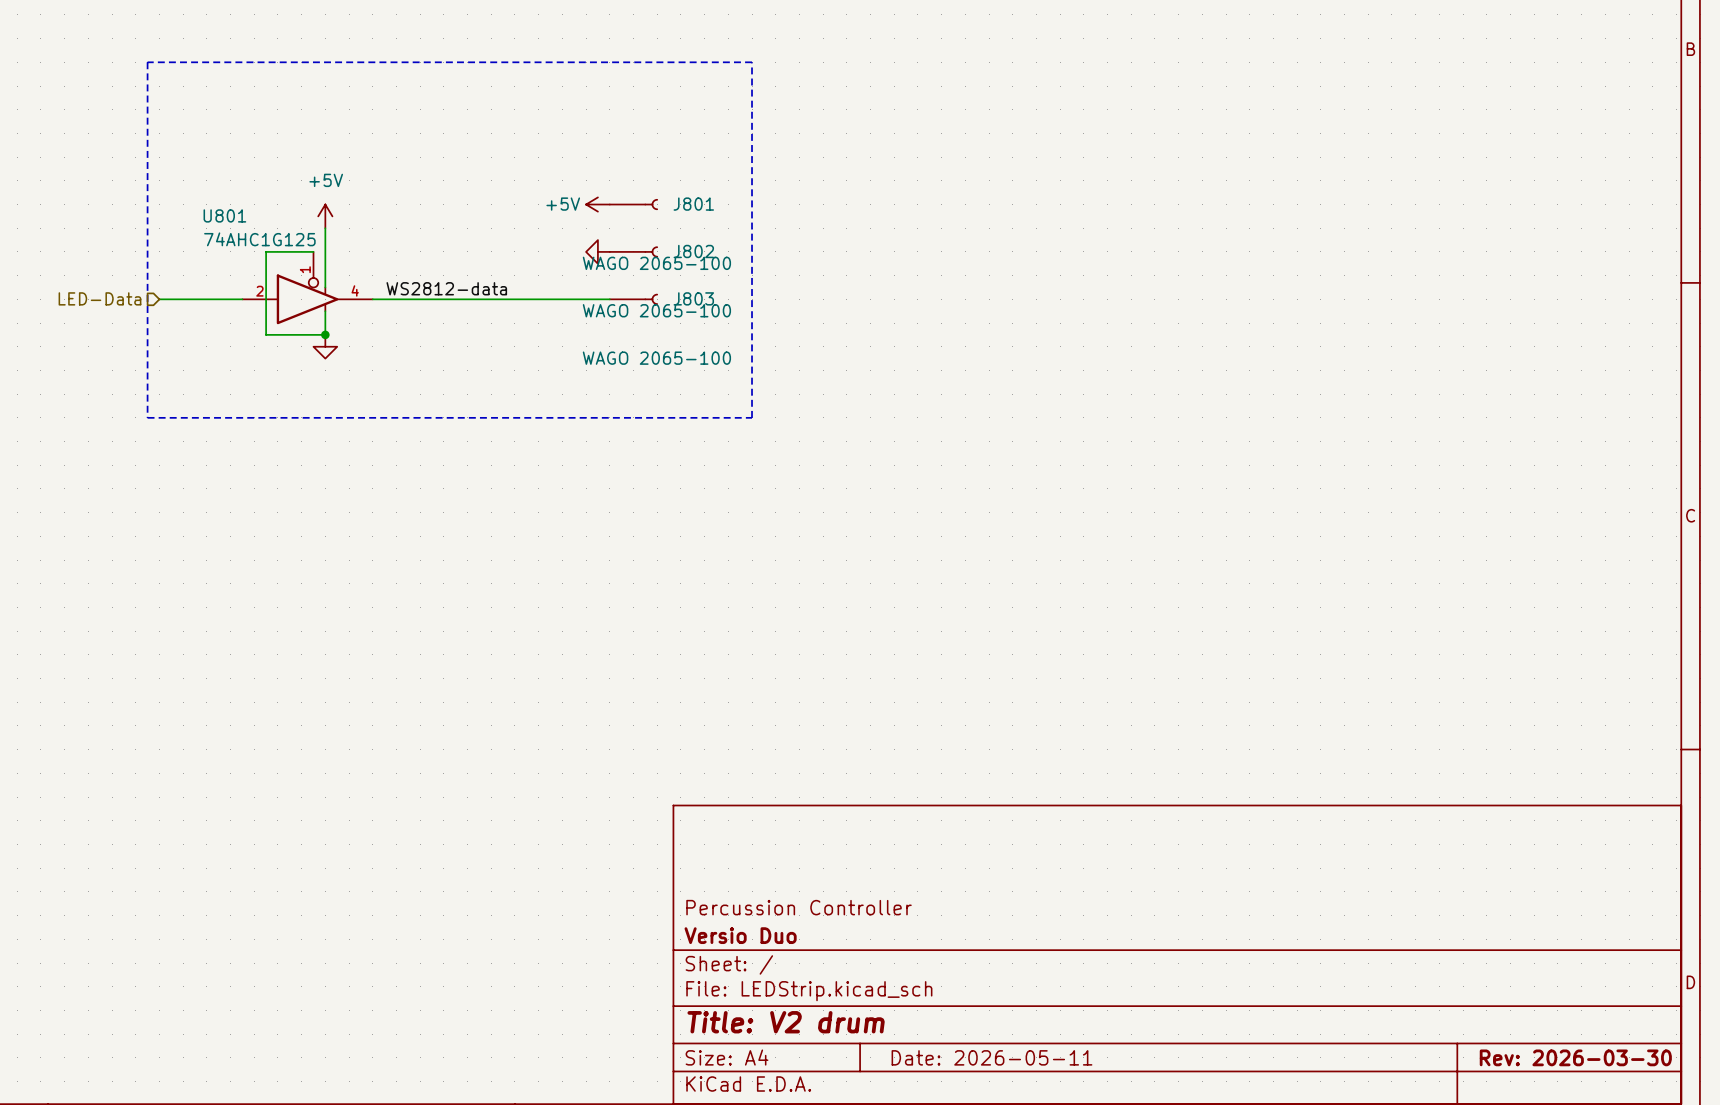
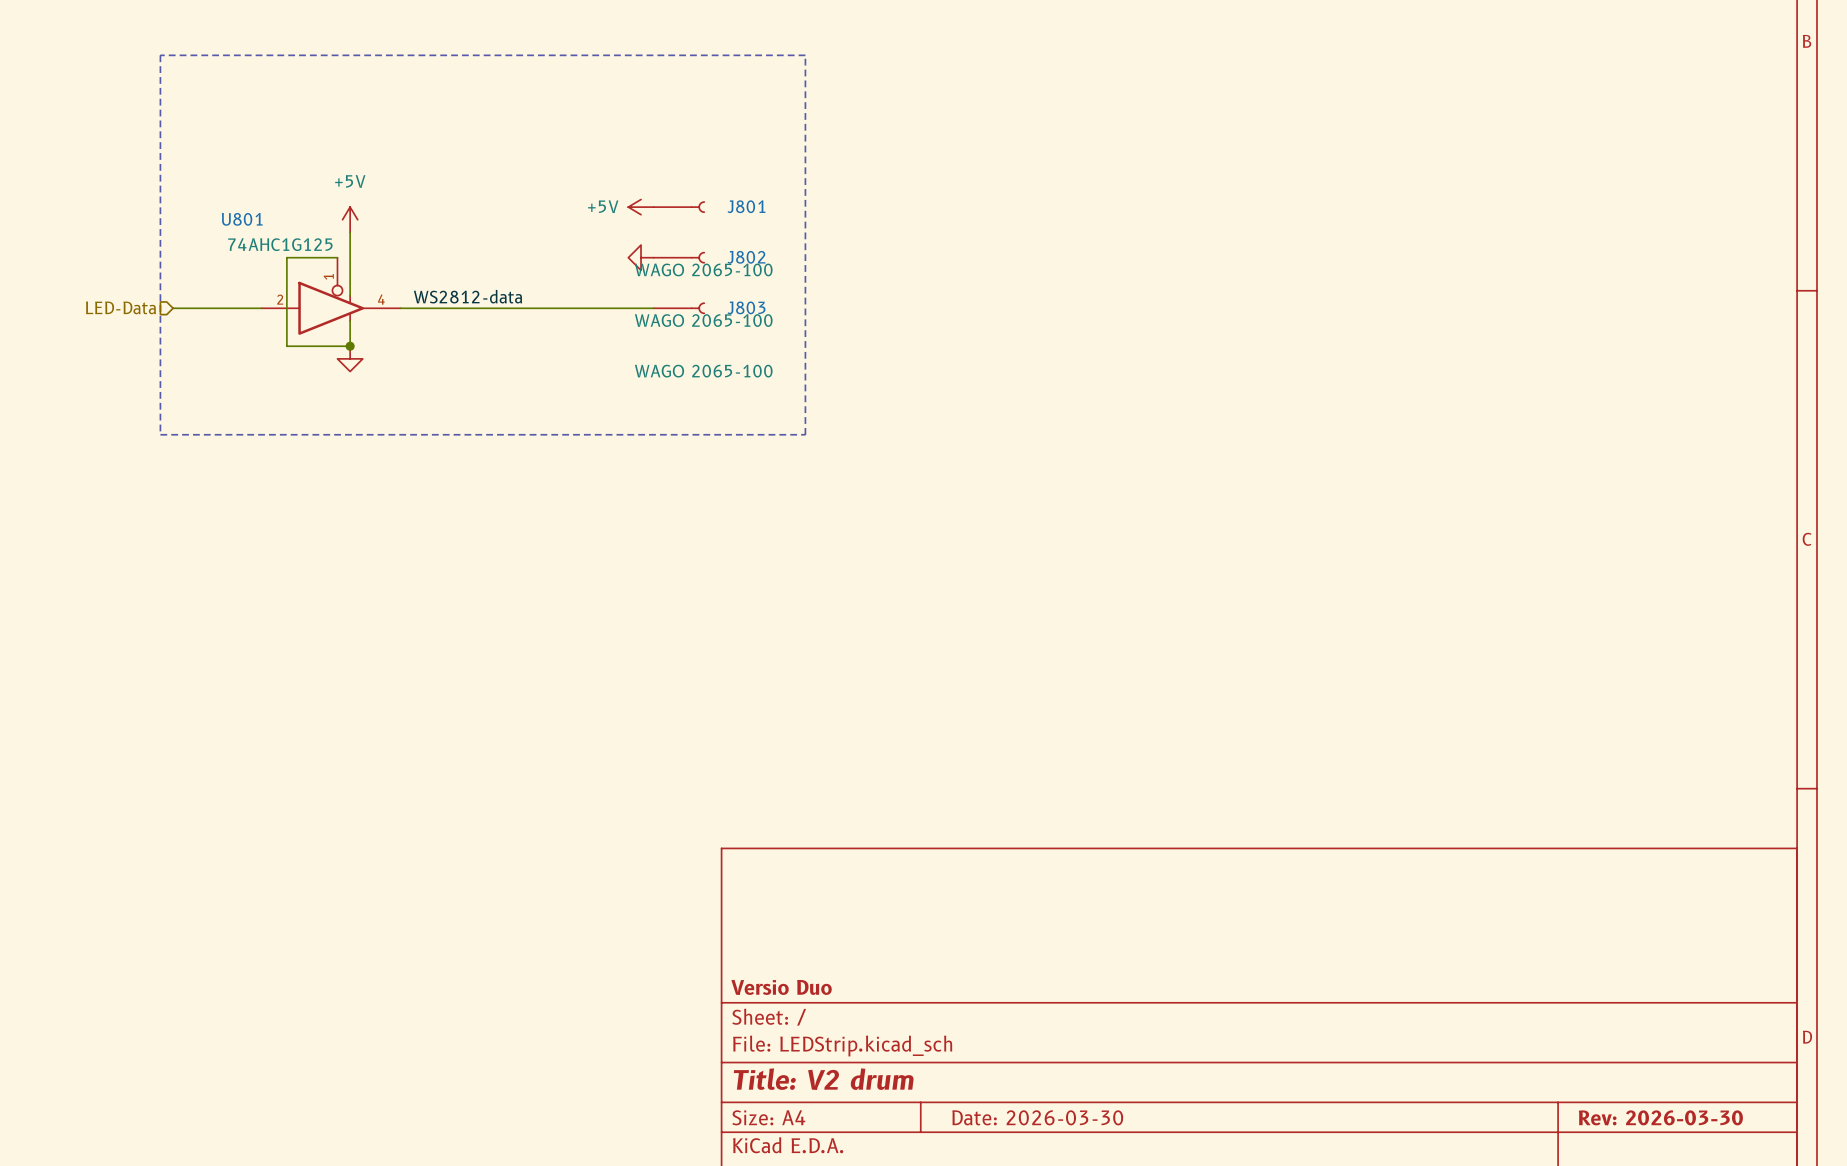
title block: Percussion Controller (799, 907) -> none
title block: Date: 2026-05-11 (991, 1057) -> Date: 2026-03-30 (1037, 1117)

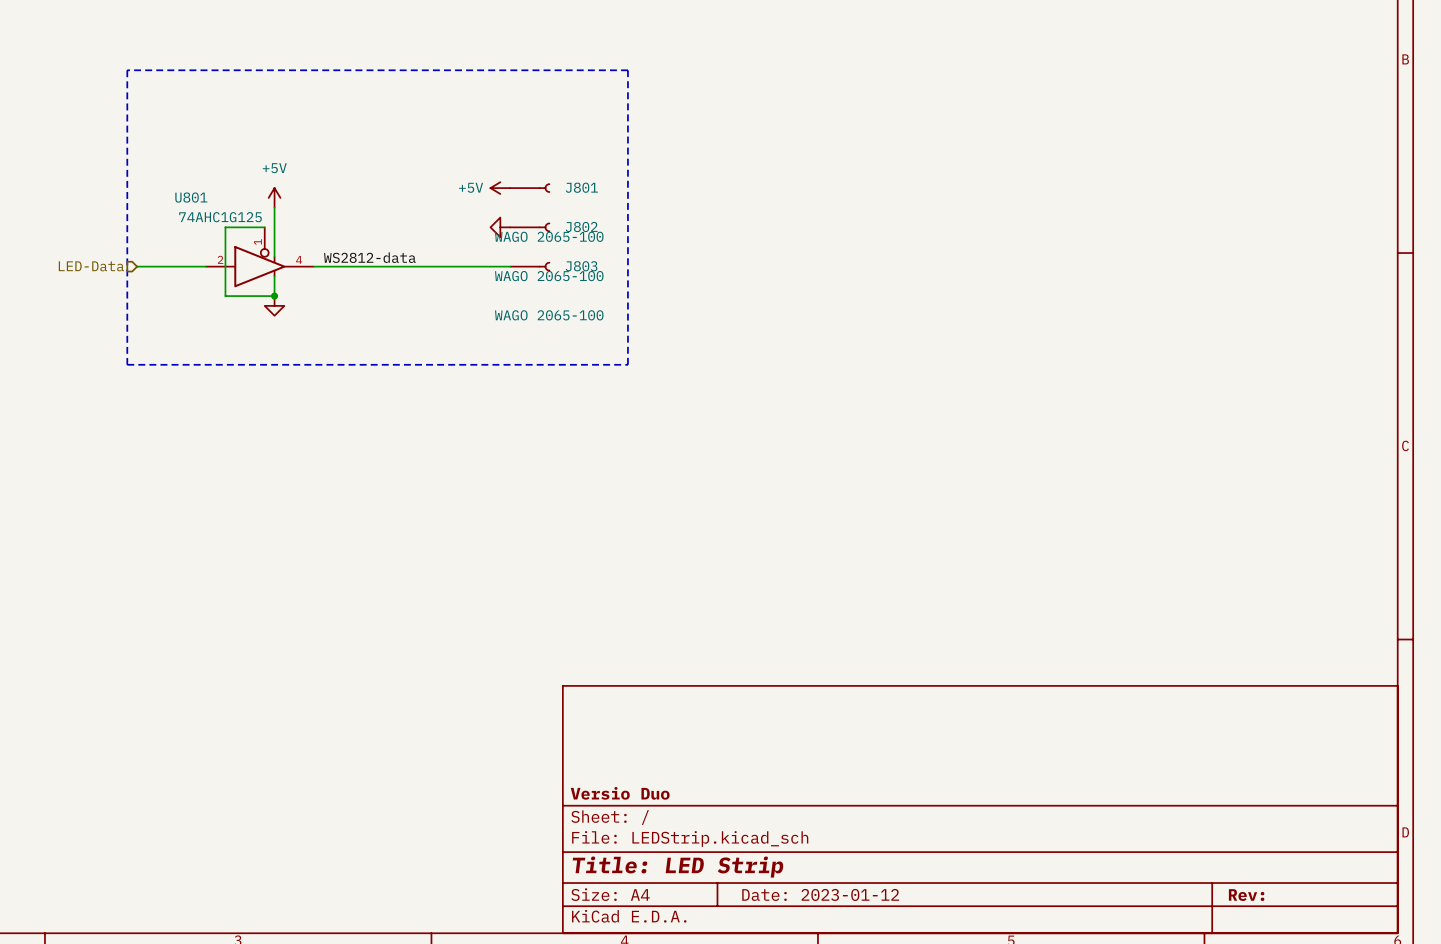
title block: Title: V2 drum (823, 1079) -> Title: LED Strip (678, 867)
title block: Date: 2026-03-30 (1037, 1117) -> Date: 2023-01-12 (820, 894)
title block: Rev: 2026-03-30 (1660, 1117) -> Rev: (1246, 895)

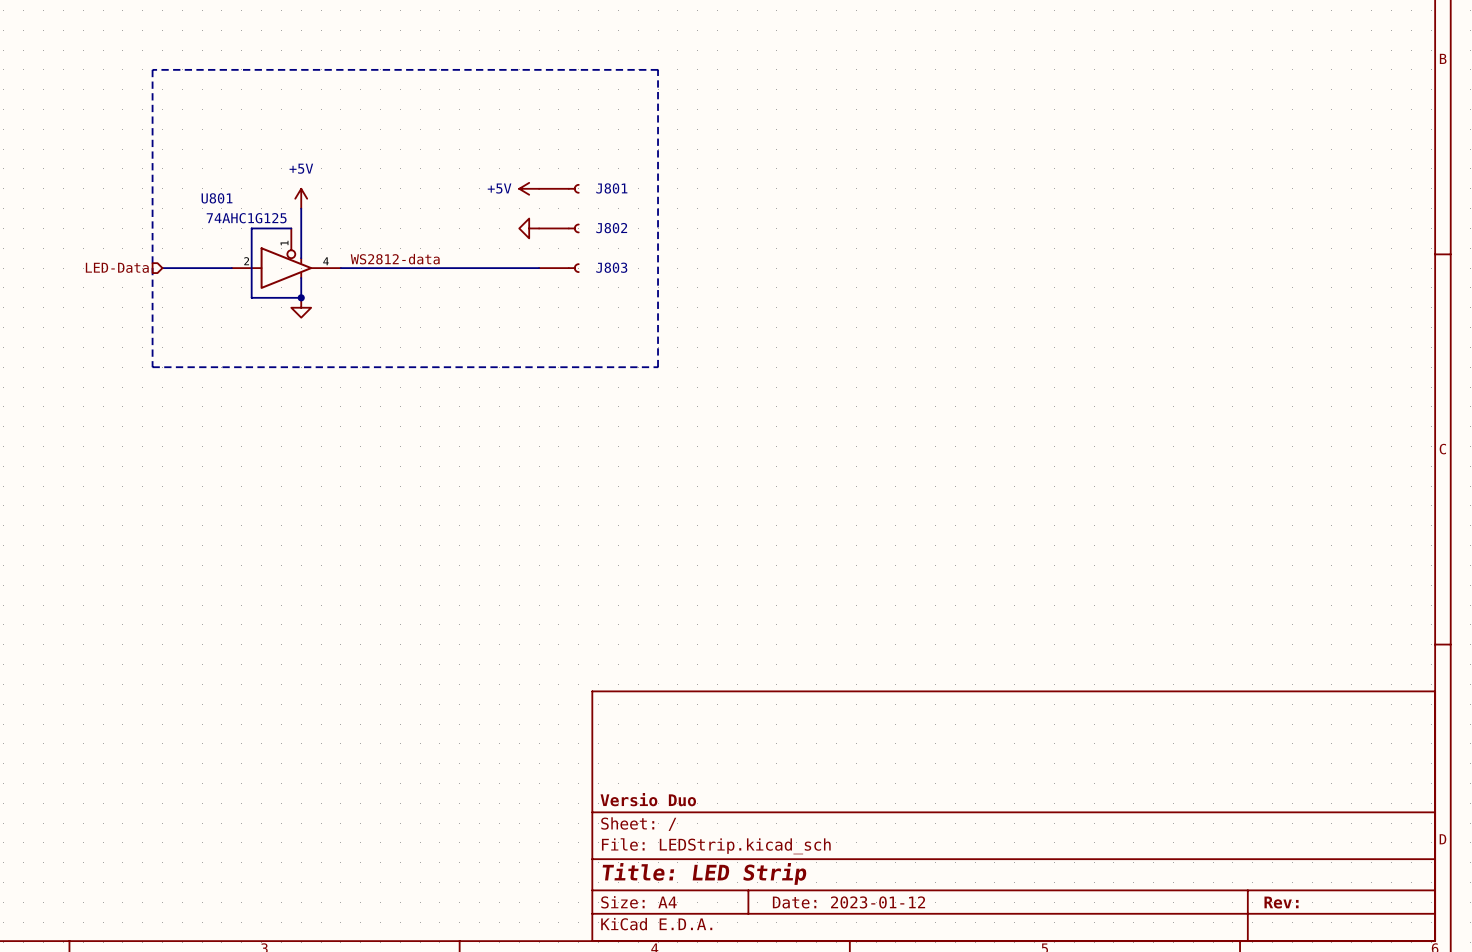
J801 value: WAGO 2065-100 (549, 236) -> none
J802 value: WAGO 2065-100 (549, 276) -> none
J803 value: WAGO 2065-100 (549, 315) -> none

